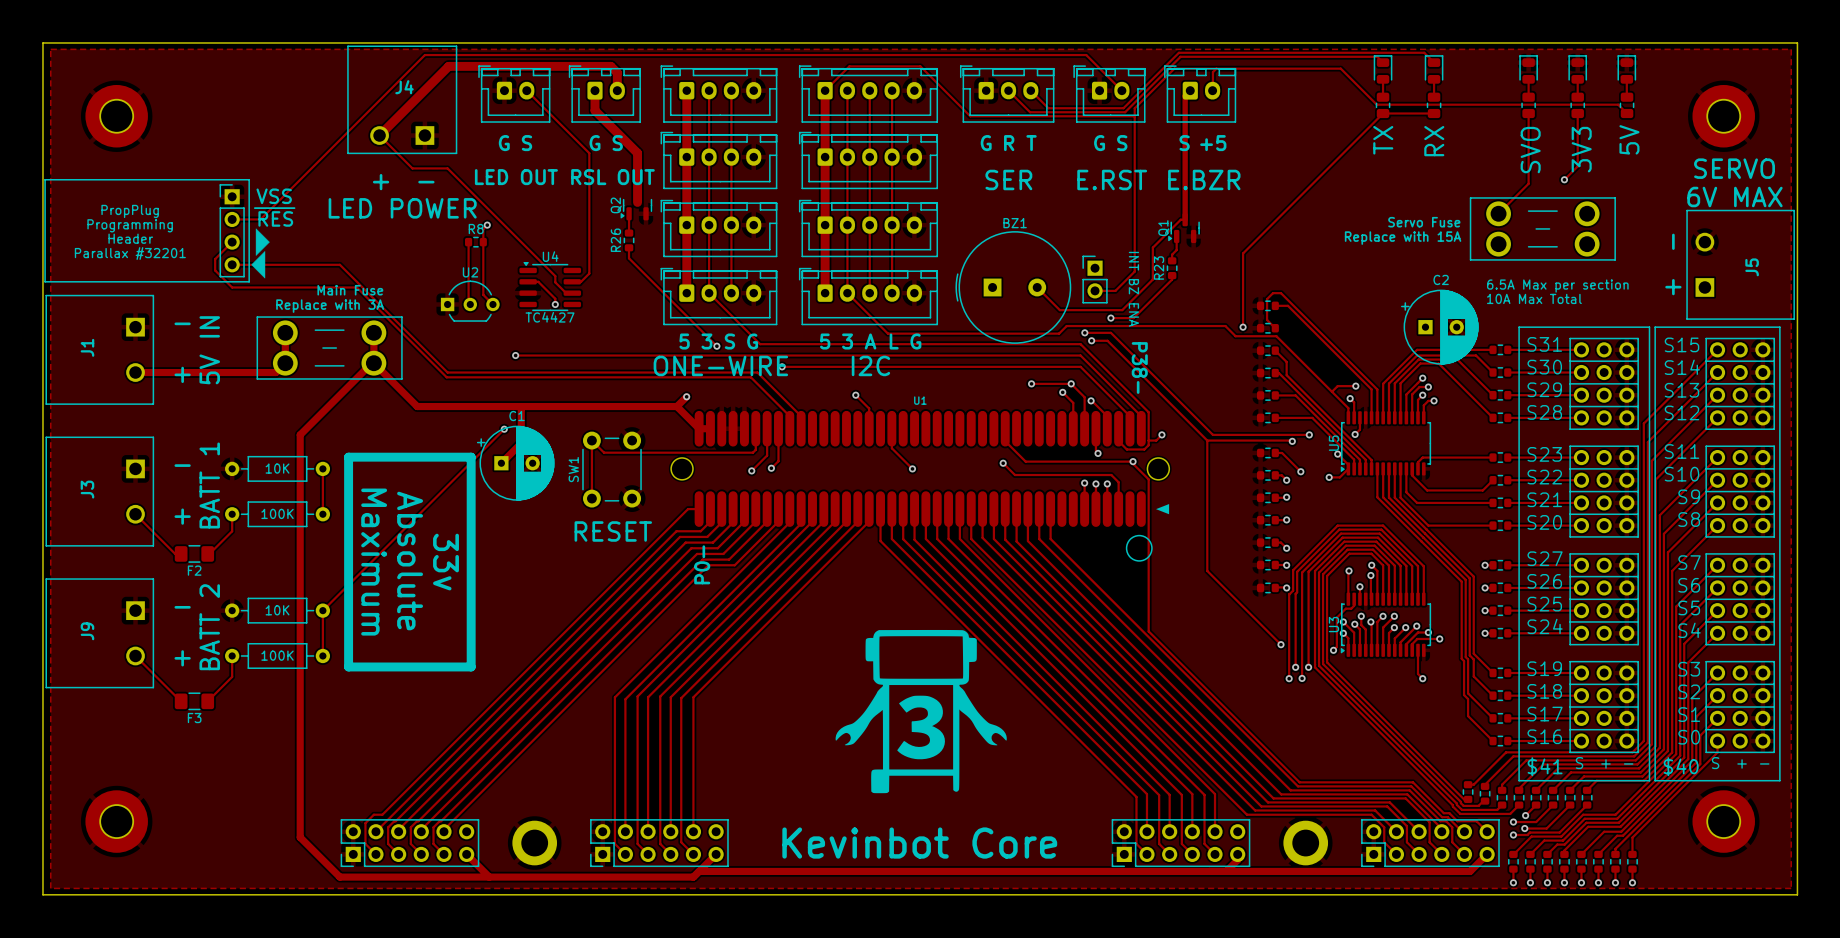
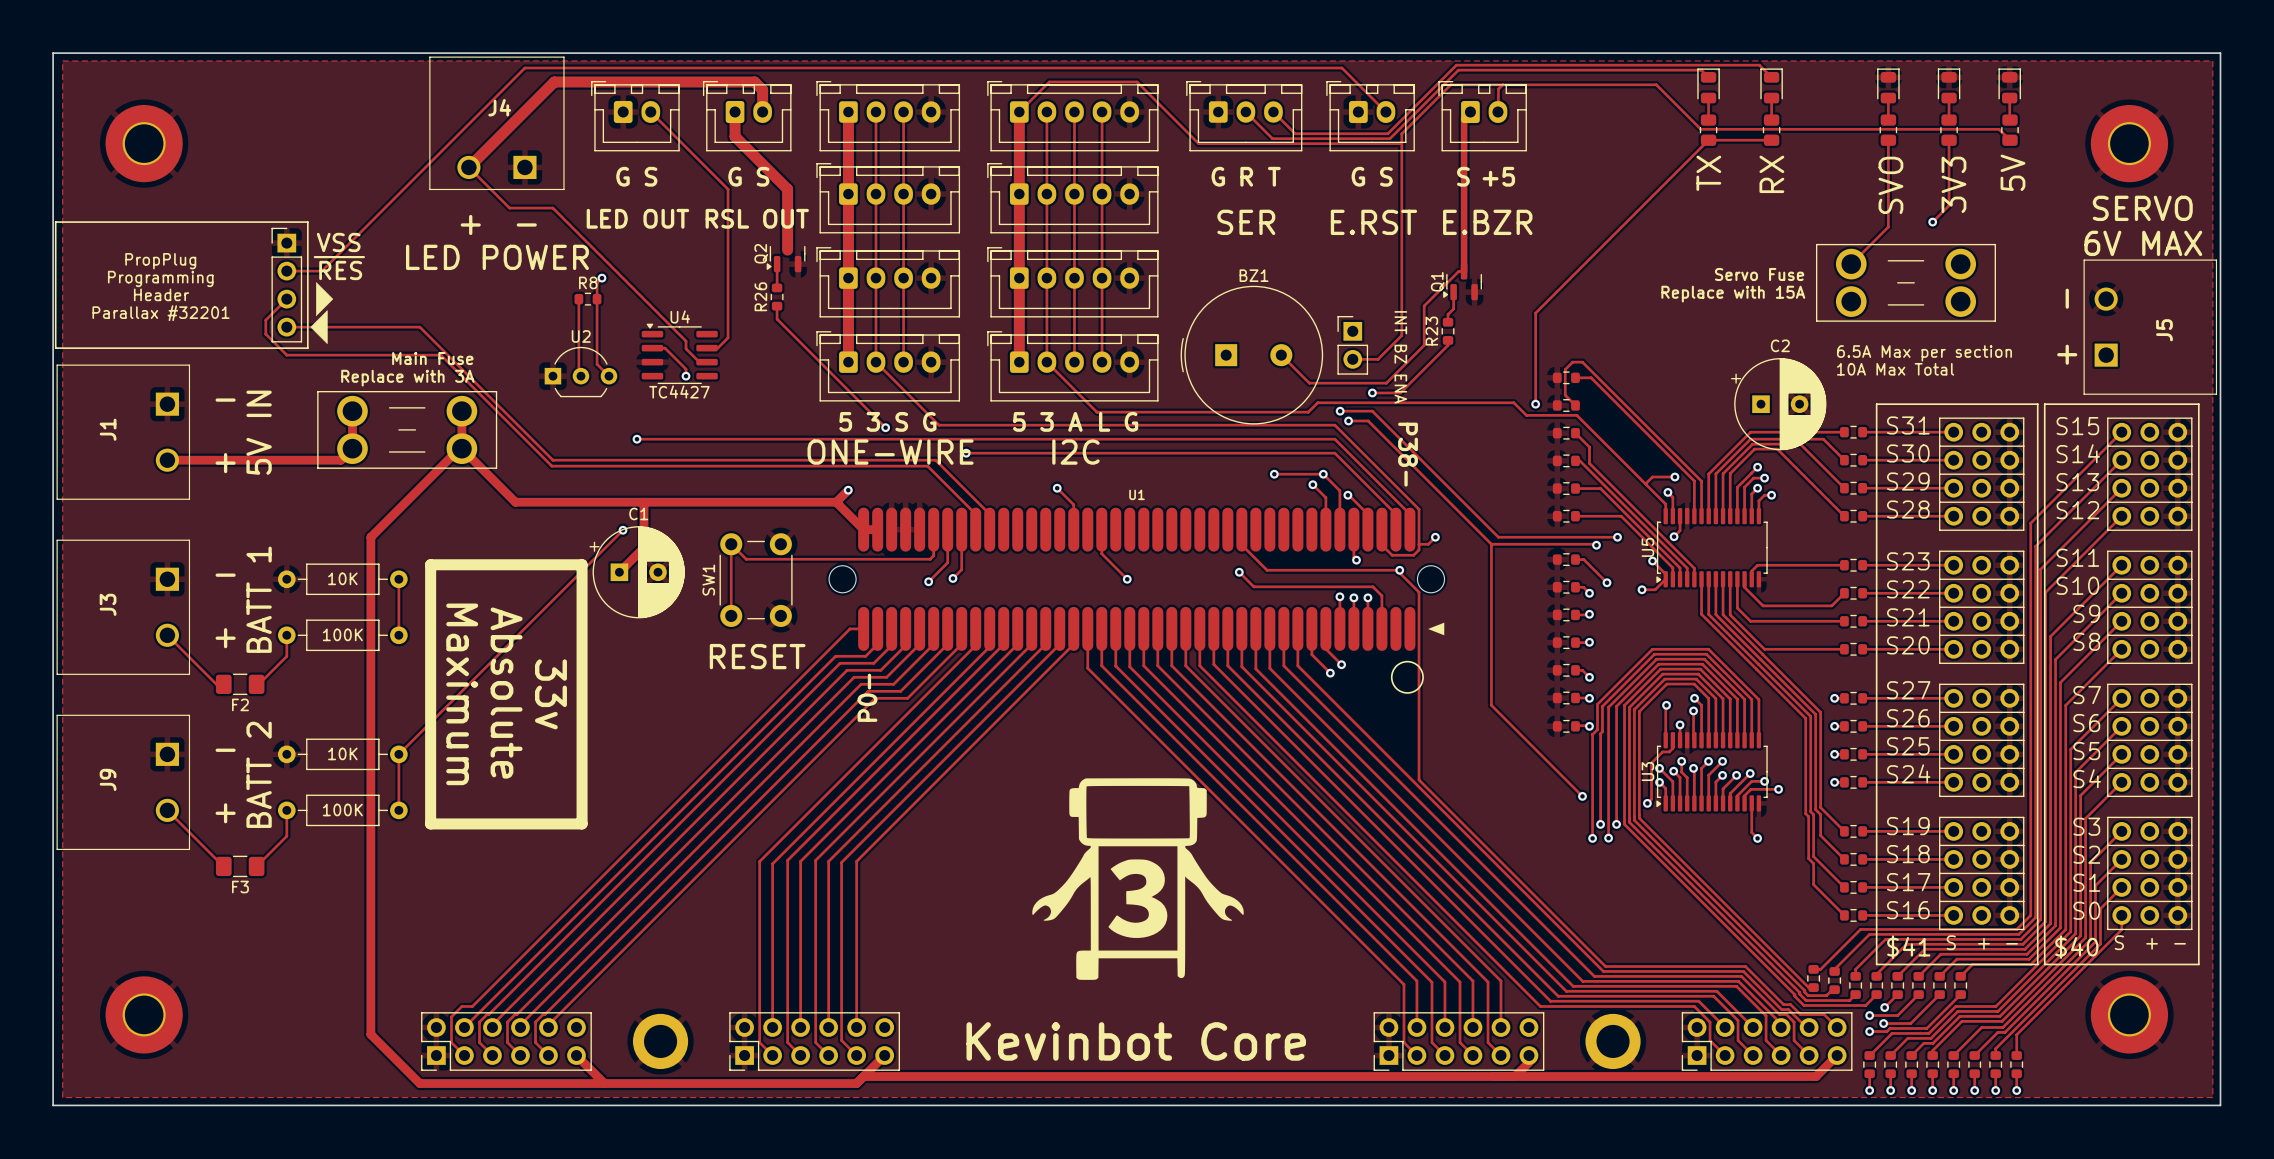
track: none -> (1311, 628) (1311, 654) (1330, 673)
track: none -> (1325, 628) (1325, 649) (1341, 664)
via: none -> (1341, 664)
via: none -> (1330, 673)

